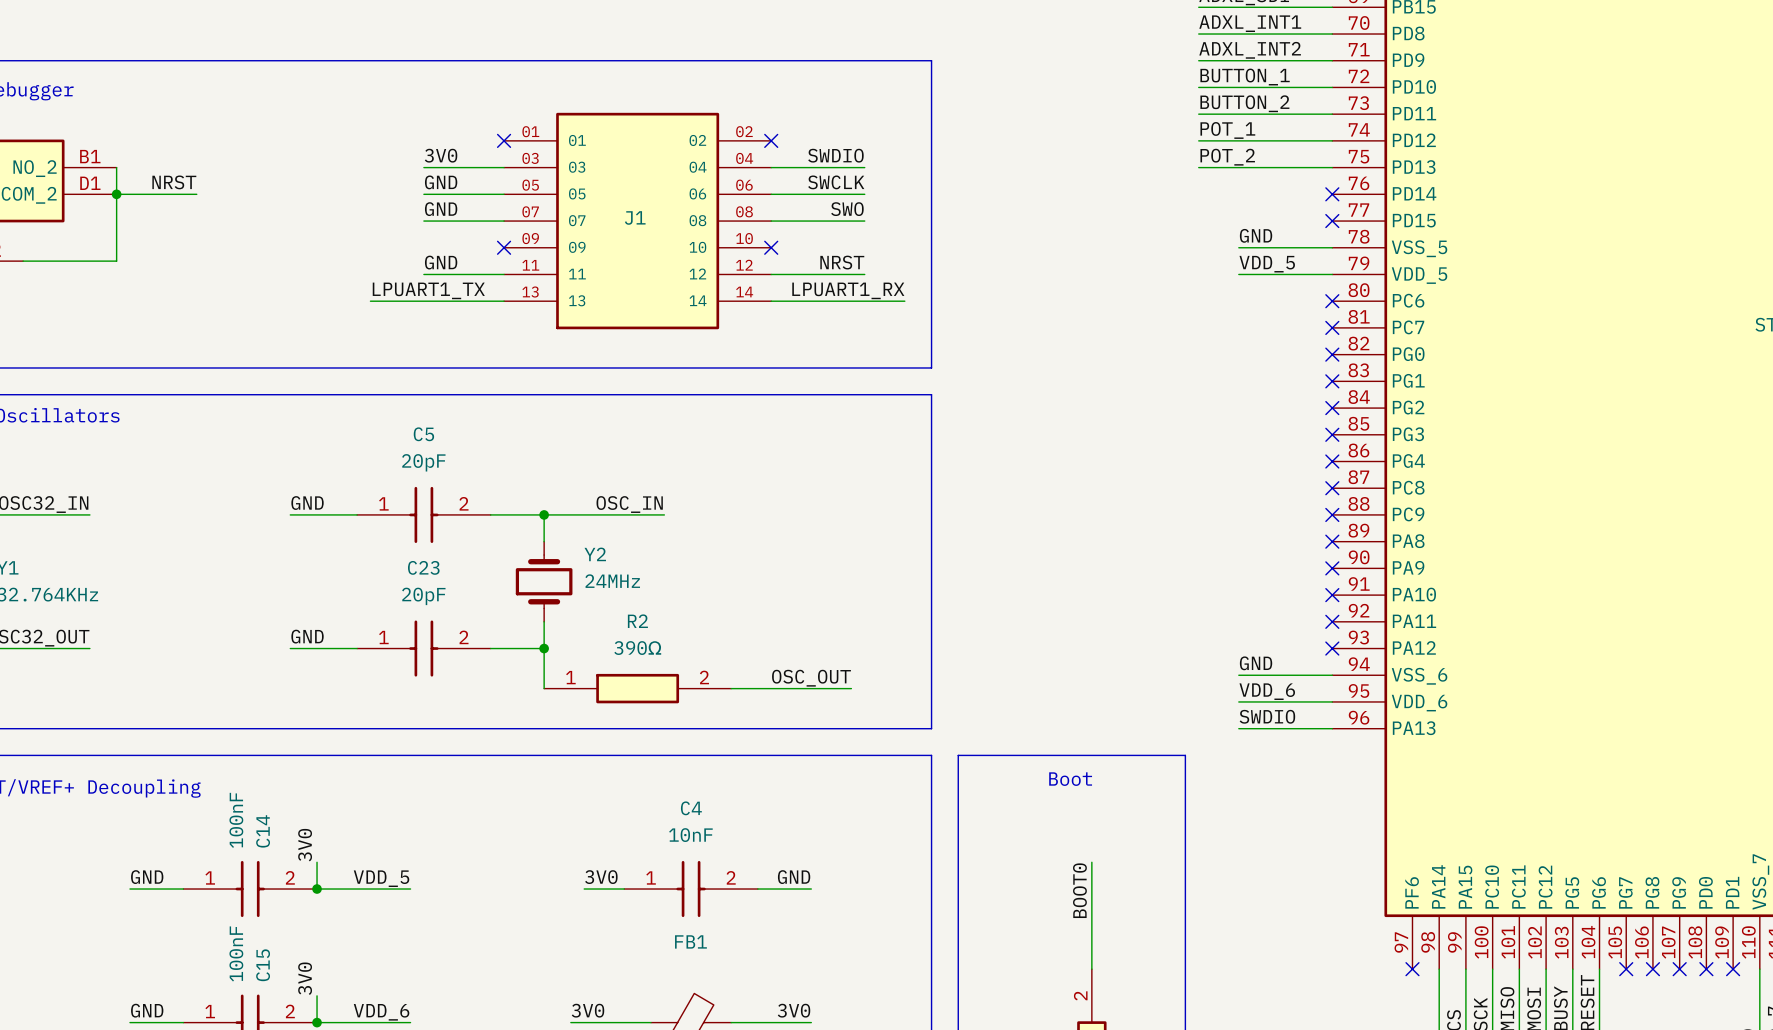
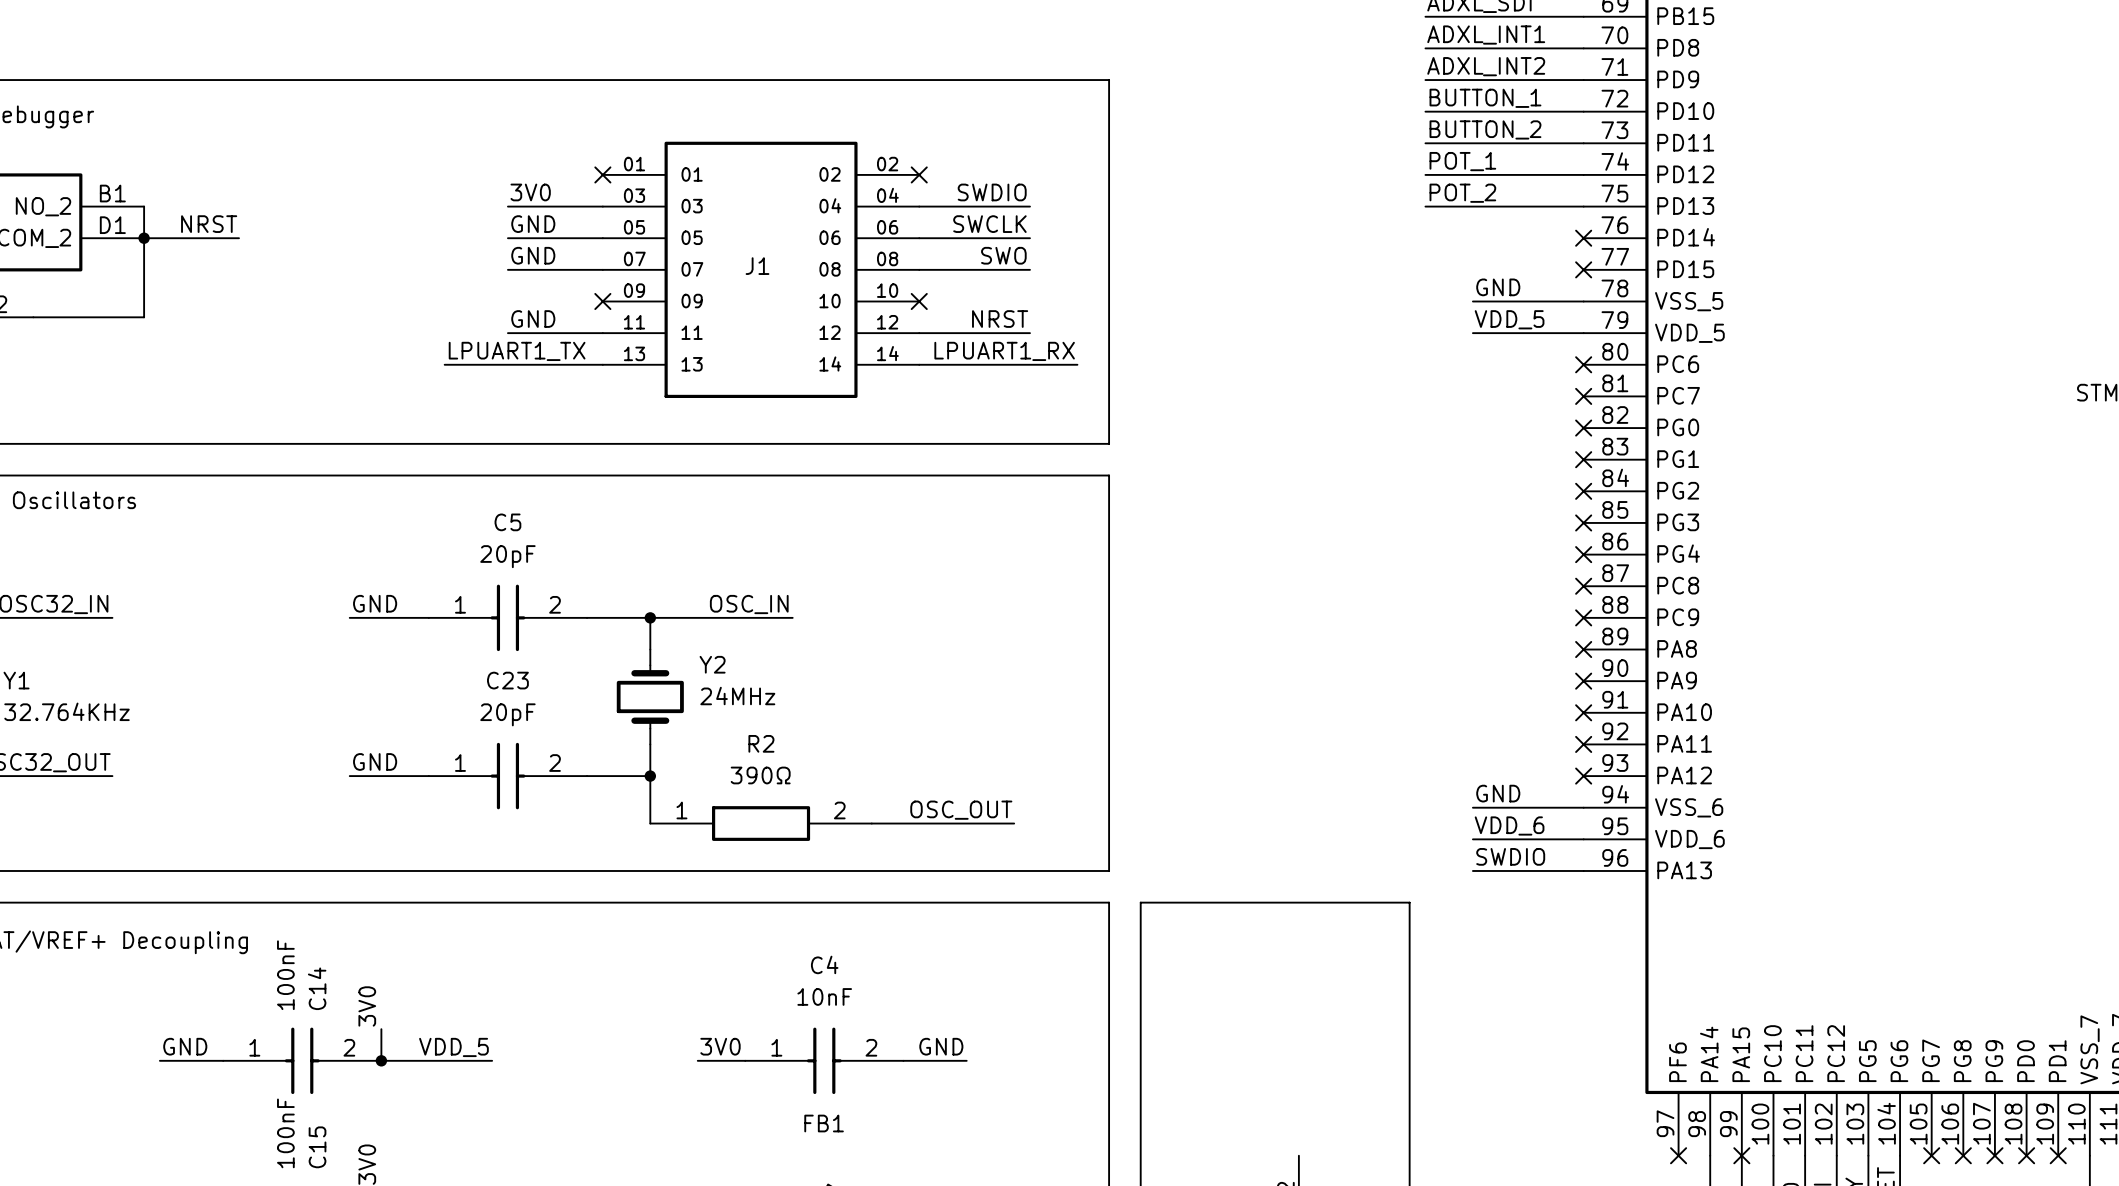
text: Boot (1070, 779) -> none
wire: (1091, 862) (1091, 969) -> none
label: BOOT0 (1079, 890) -> none
no-connect mark: none -> (1741, 1155)

